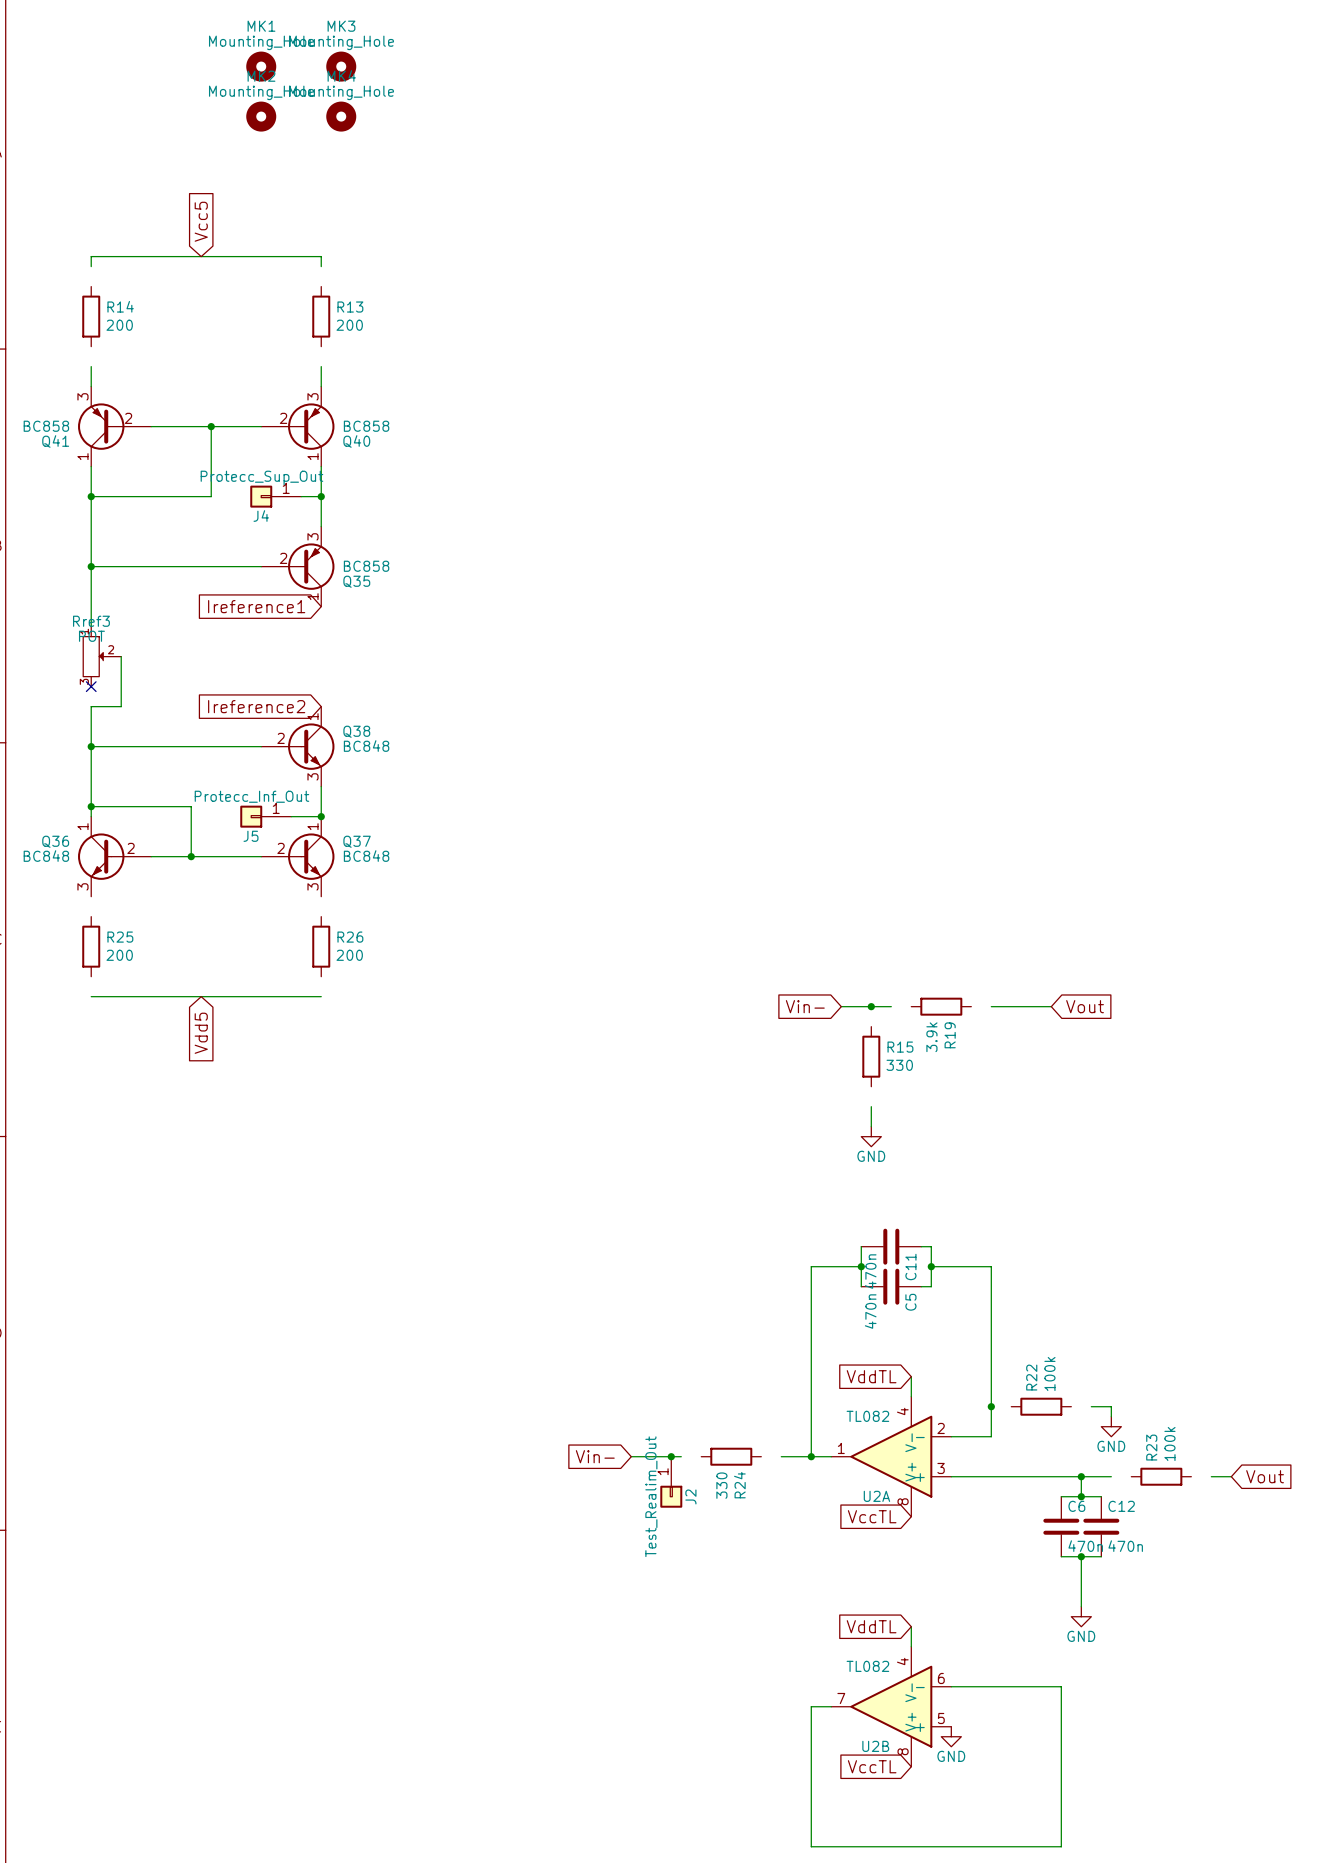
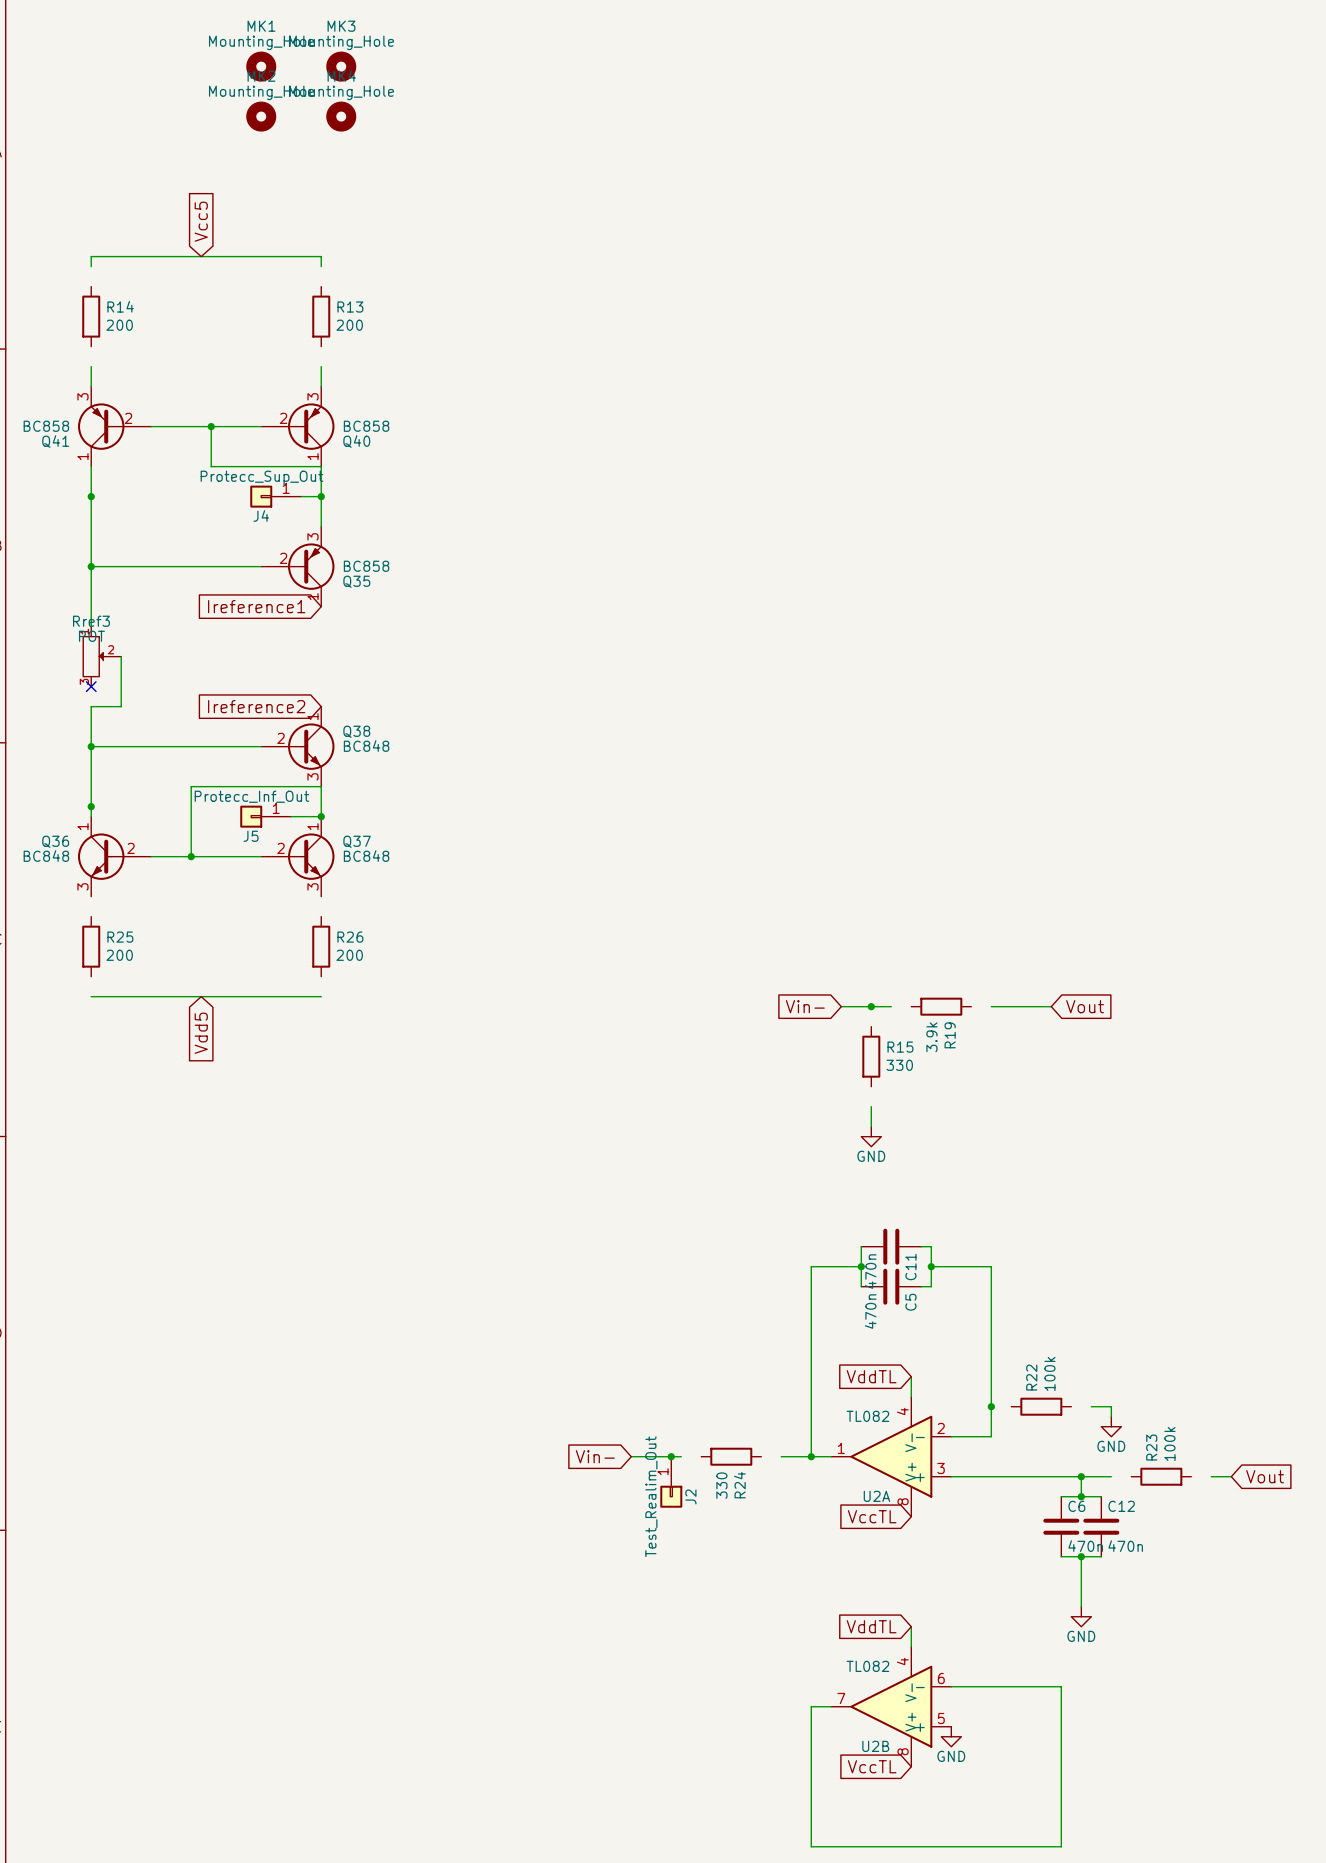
wire: (211, 466) (211, 496) (91, 496) -> (211, 466) (321, 466)
wire: (91, 806) (191, 806) -> (321, 786) (191, 786) (191, 806)

